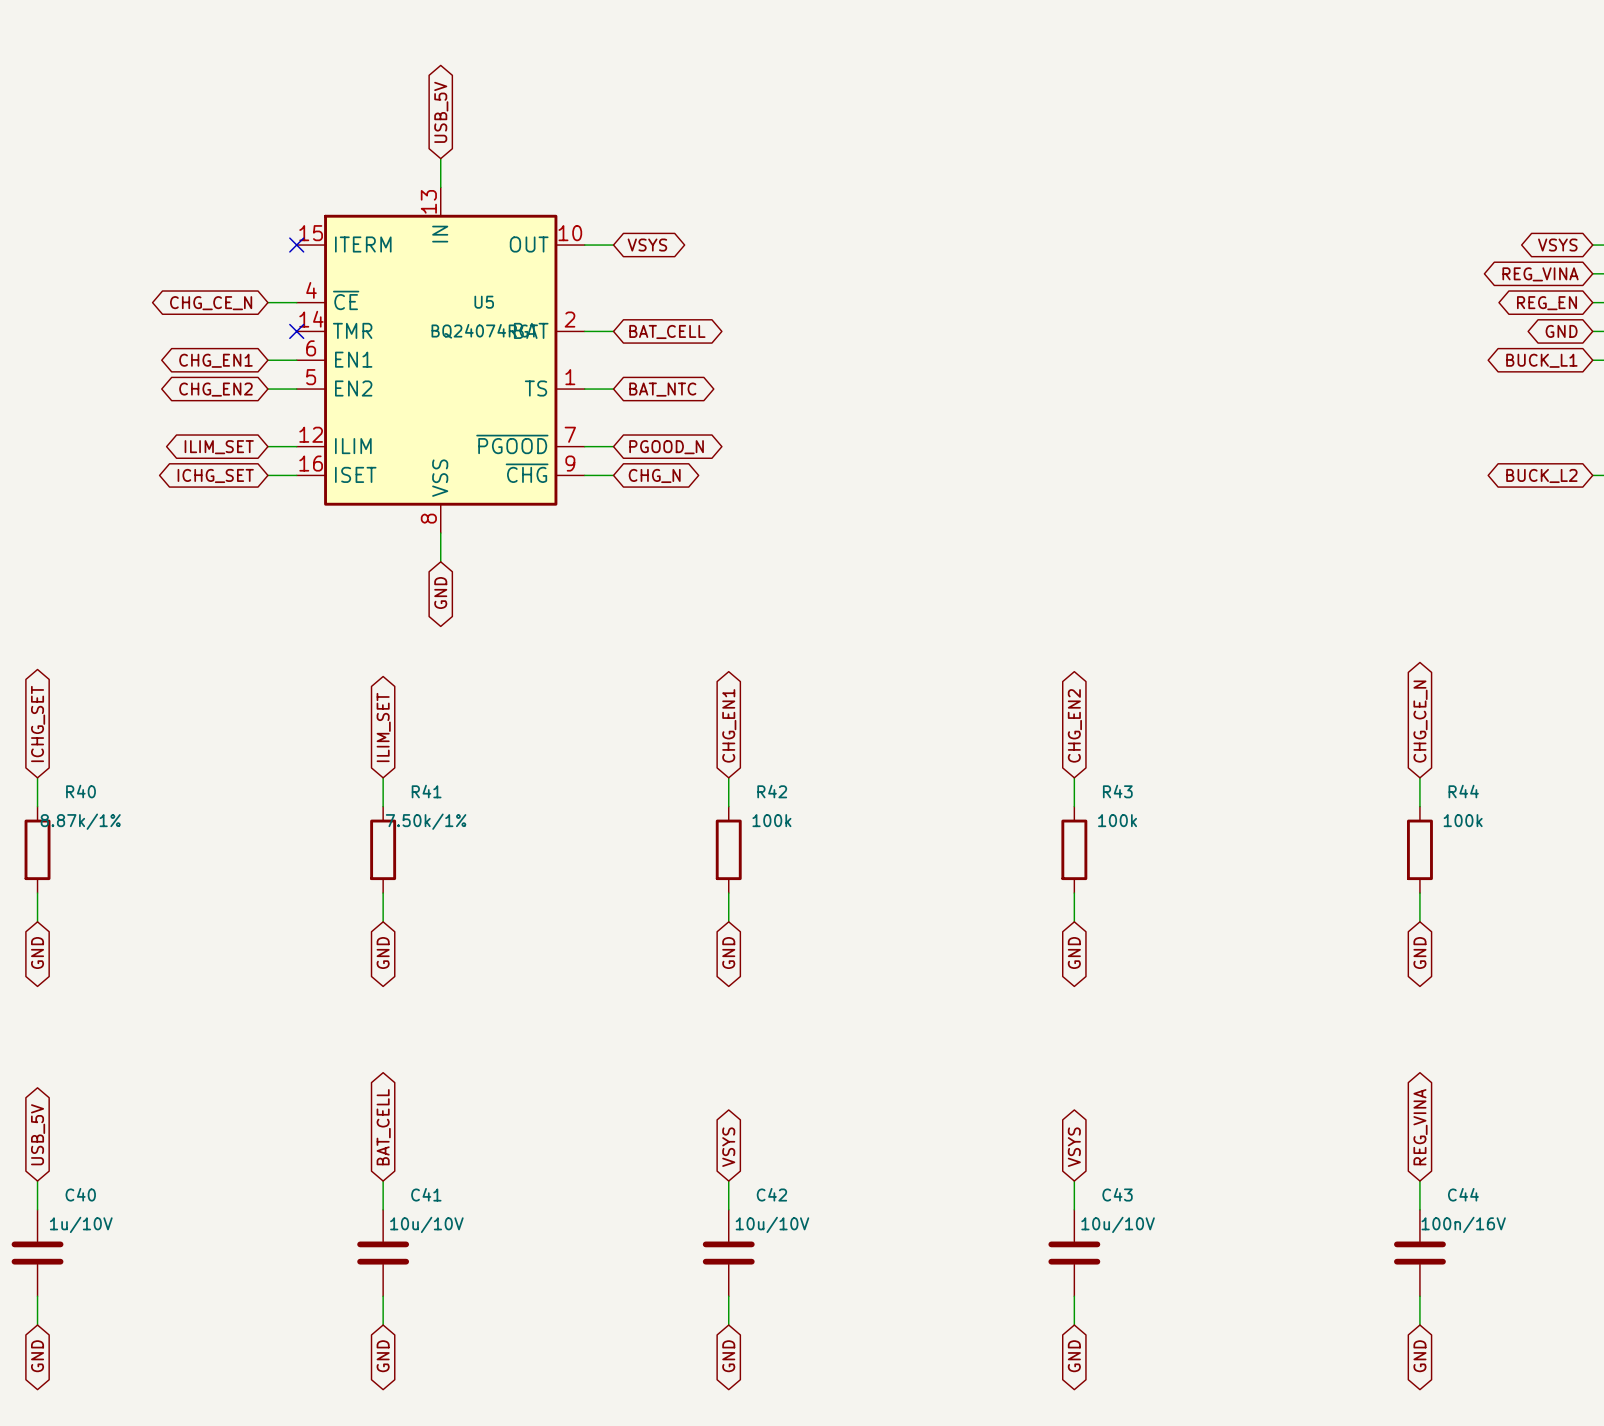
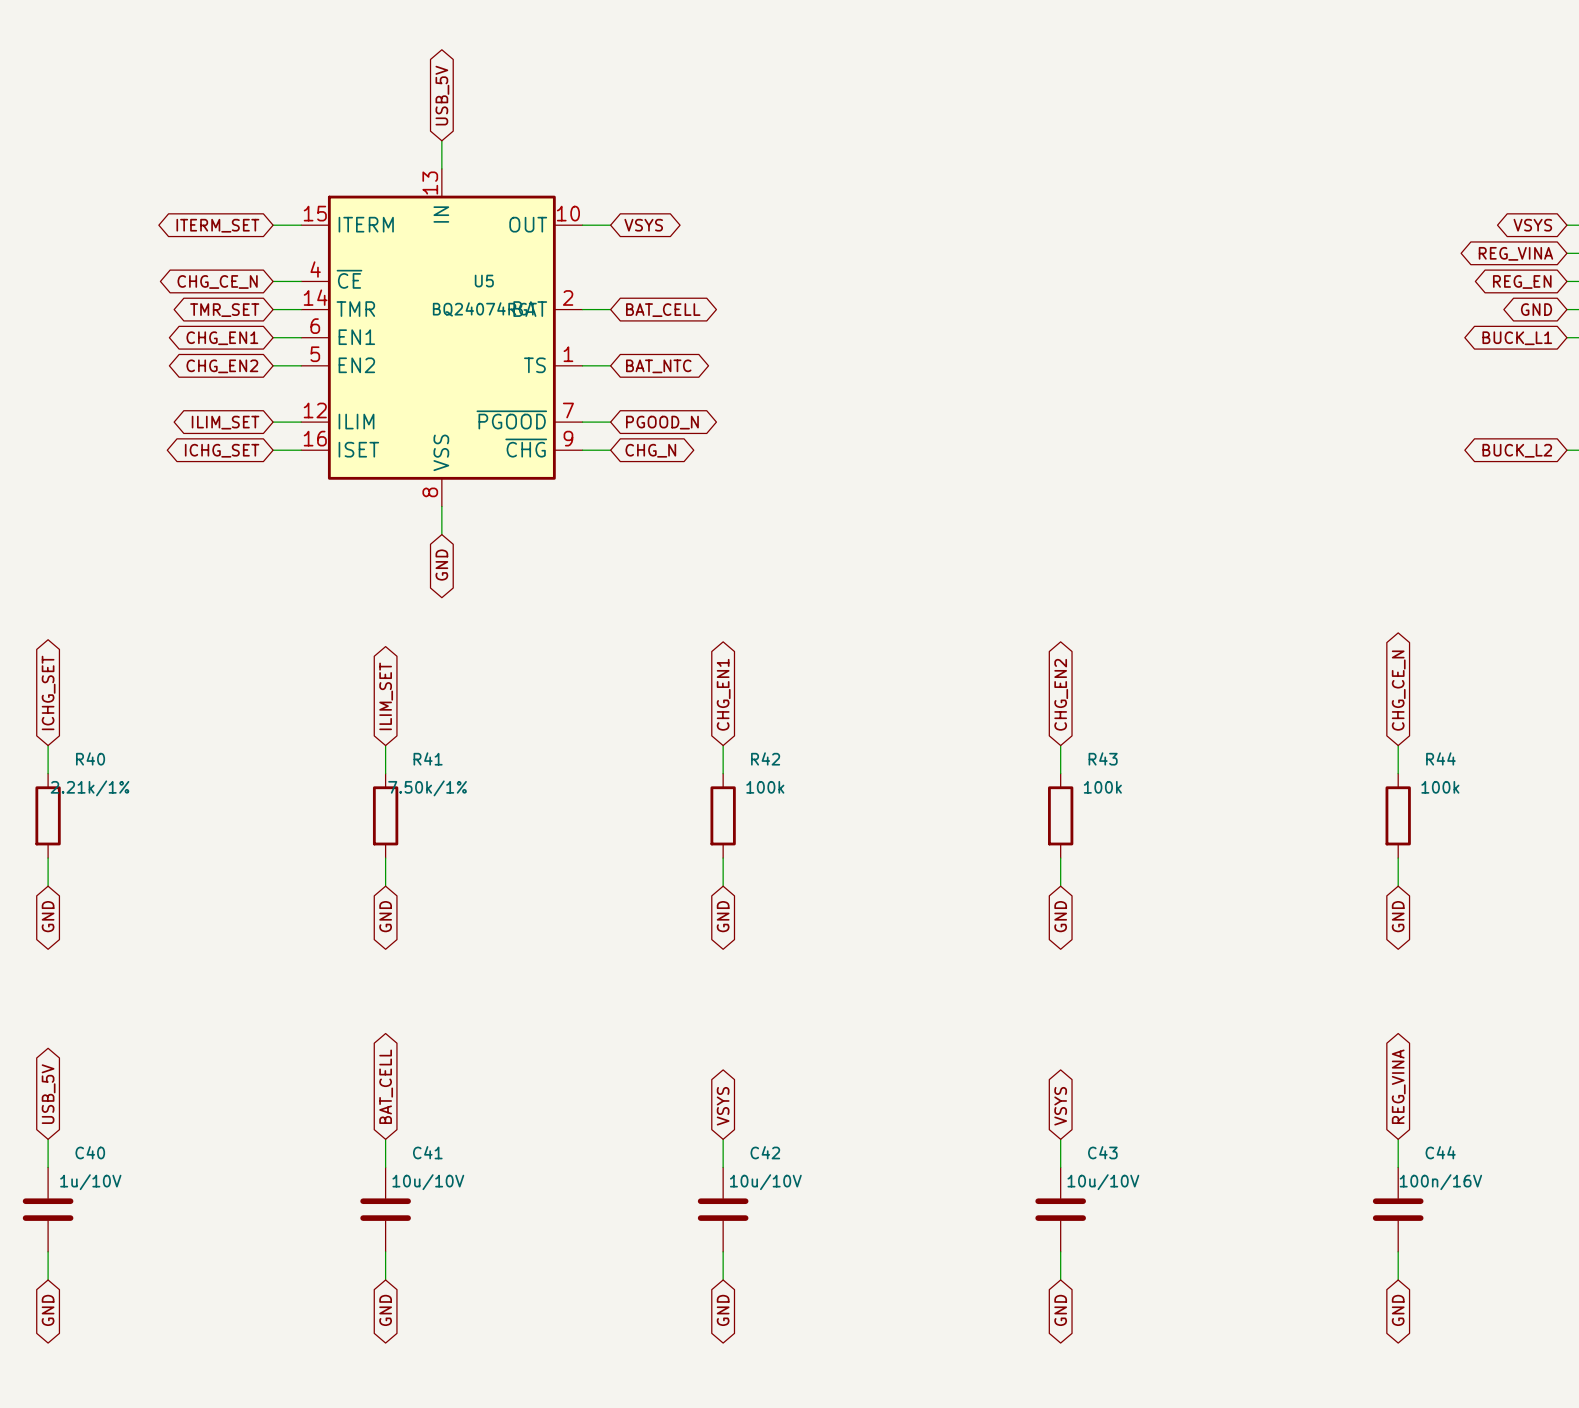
global label: none -> ITERM_SET (217, 225)
wire: none -> (273, 225) (301, 225)
no-connect mark: (296, 245) -> none
global label: none -> TMR_SET (224, 310)
wire: none -> (273, 309) (301, 309)
no-connect mark: (296, 331) -> none
R40 value: 8.87k/1% (80, 821) -> 2.21k/1% (90, 788)

